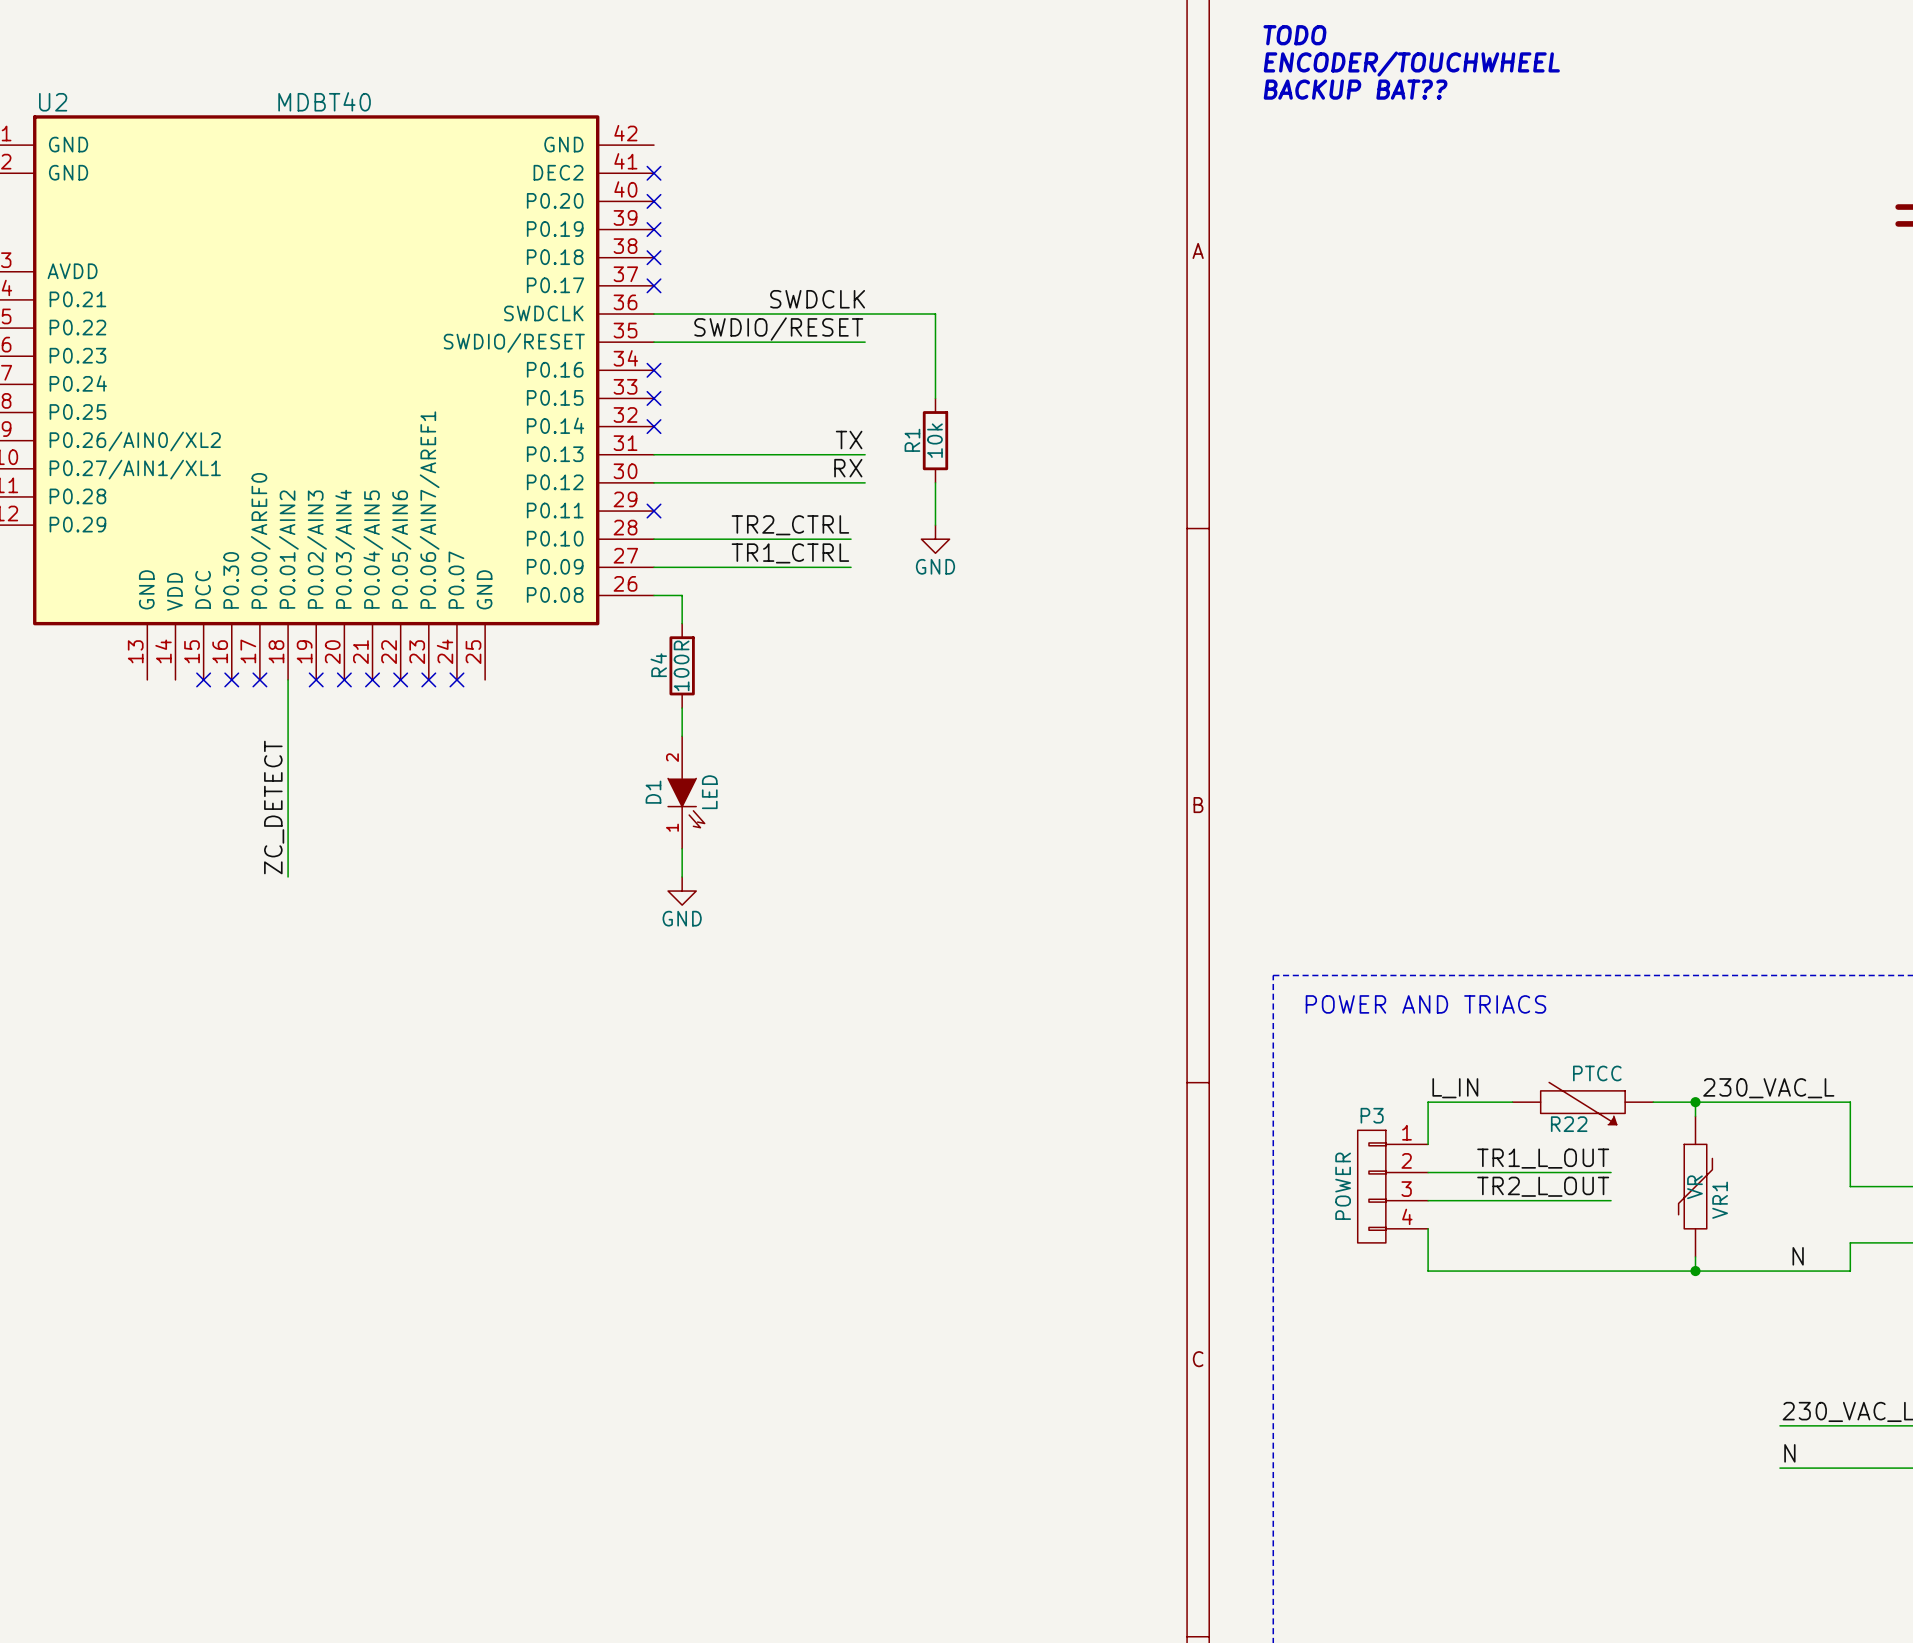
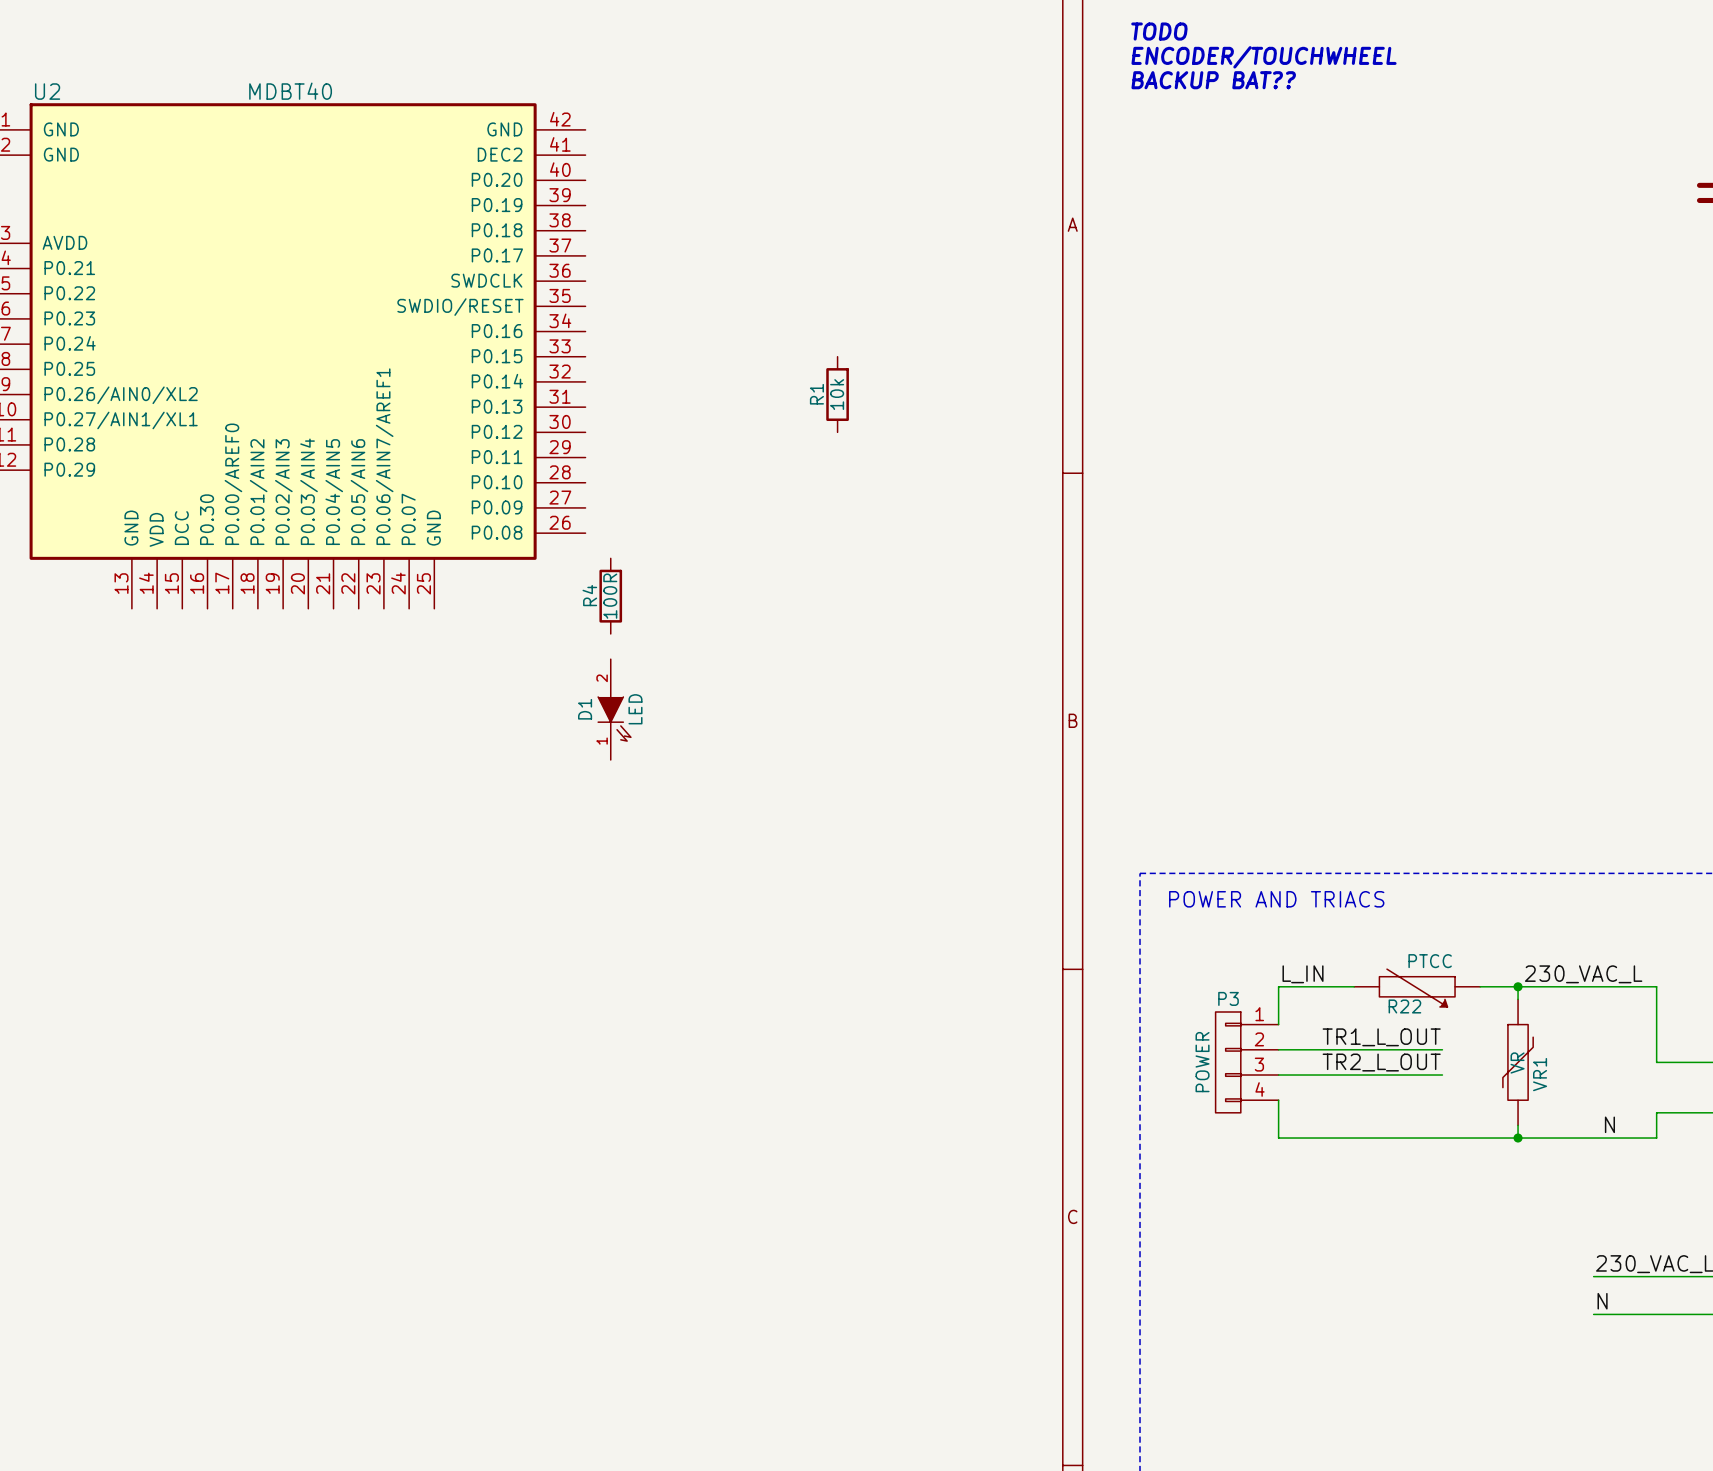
no-connect mark: (654, 173) -> none
no-connect mark: (654, 201) -> none
no-connect mark: (654, 229) -> none
no-connect mark: (654, 257) -> none
no-connect mark: (654, 285) -> none
label: SWDCLK (817, 299) -> none
wire: (654, 313) (935, 313) (935, 398) -> none
label: SWDIO/RESET (778, 329) -> none
wire: (654, 342) (865, 342) -> none
no-connect mark: (654, 370) -> none
no-connect mark: (654, 398) -> none
no-connect mark: (654, 426) -> none
label: TX (849, 440) -> none
wire: (654, 454) (865, 454) -> none
label: RX (848, 468) -> none
wire: (654, 482) (865, 482) -> none
wire: (935, 482) (935, 525) -> none
no-connect mark: (654, 511) -> none
label: TR2_CTRL (790, 525) -> none
wire: (654, 539) (851, 539) -> none
power symbol: GND (935, 539) -> none
label: TR1_CTRL (790, 553) -> none
wire: (654, 567) (851, 567) -> none
wire: (654, 595) (682, 595) (682, 623) -> none
no-connect mark: (203, 679) -> none
no-connect mark: (231, 679) -> none
no-connect mark: (259, 679) -> none
wire: (288, 679) (288, 876) -> none
no-connect mark: (316, 679) -> none
no-connect mark: (344, 679) -> none
no-connect mark: (372, 679) -> none
no-connect mark: (400, 679) -> none
no-connect mark: (428, 679) -> none
no-connect mark: (456, 679) -> none
wire: (682, 708) (682, 736) -> none
label: ZC_DETECT (274, 807) -> none
wire: (682, 848) (682, 876) -> none
power symbol: GND (682, 891) -> none

